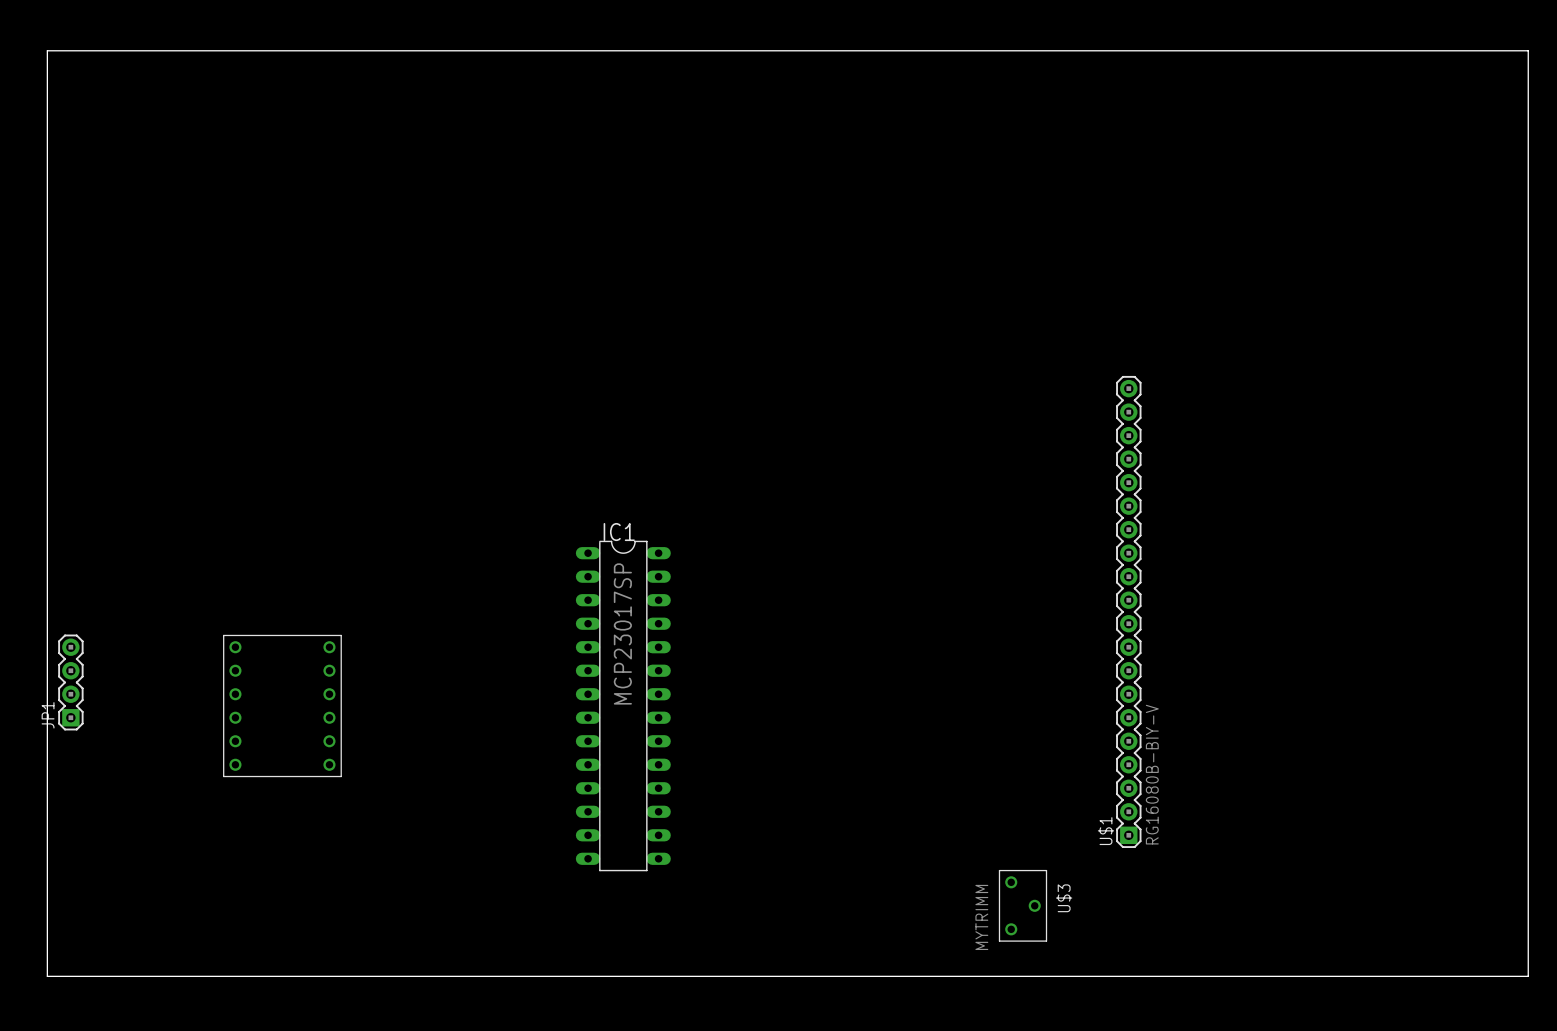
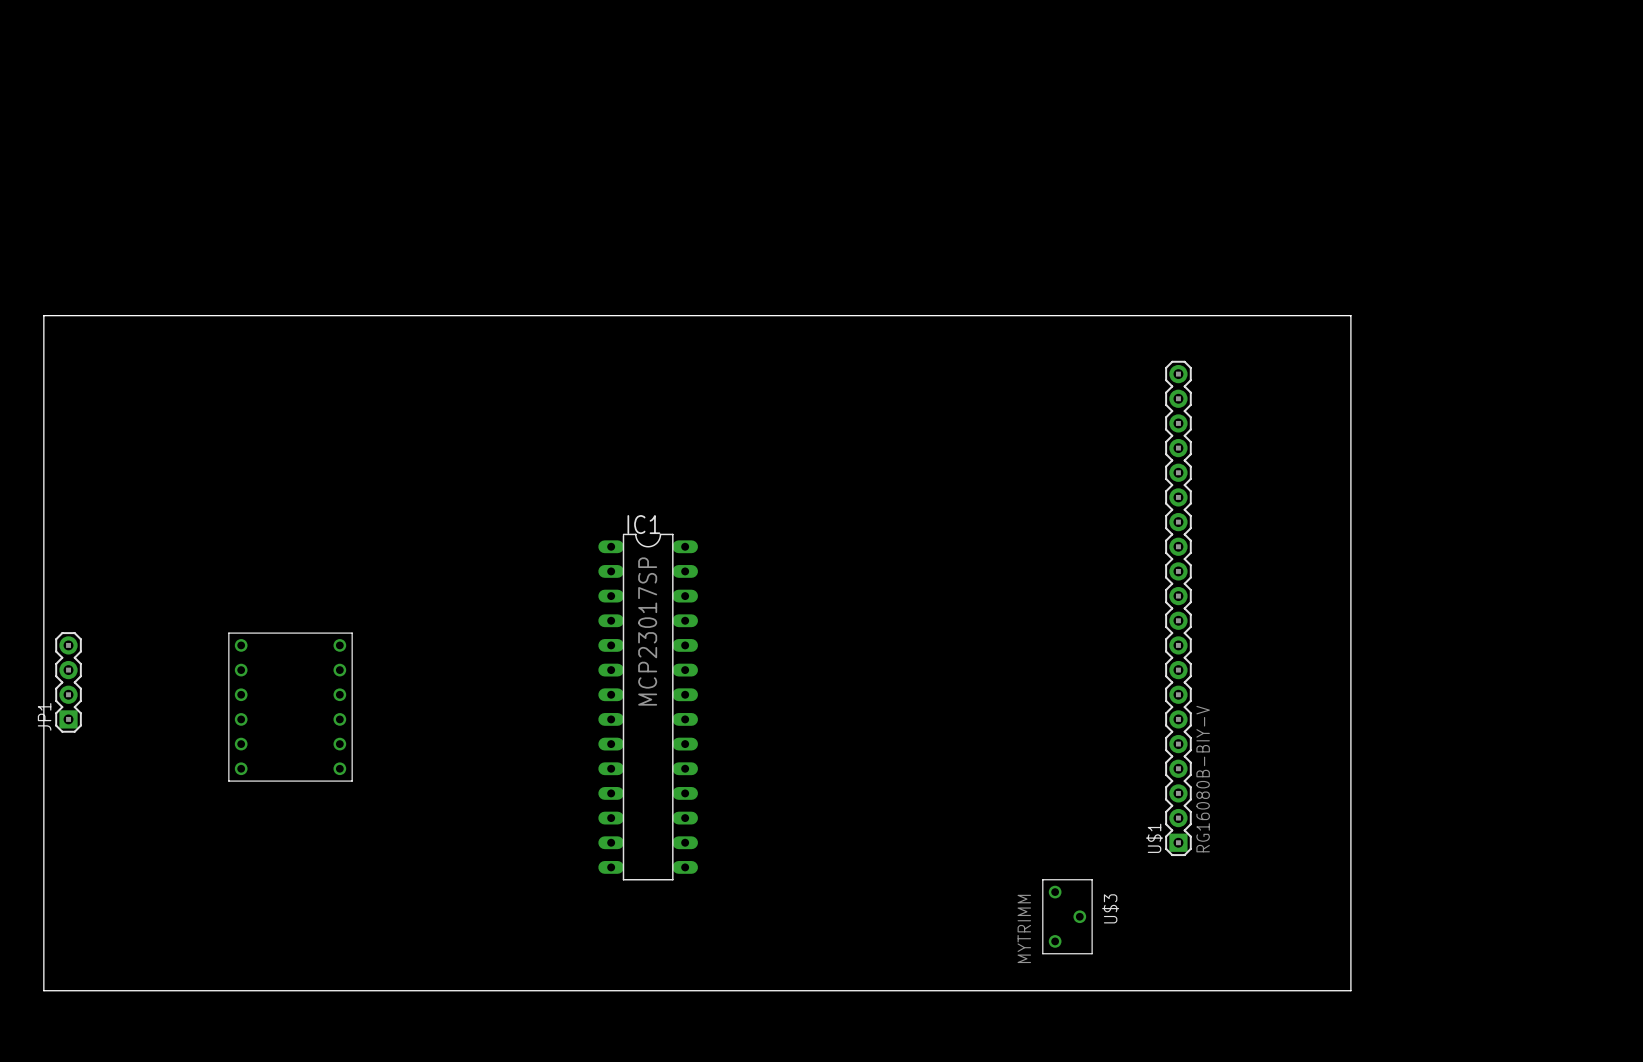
board edge: (47, 332) (47, 50) (1528, 50) (1528, 976) (1293, 976) -> (43, 315) (1350, 315) (1350, 990)

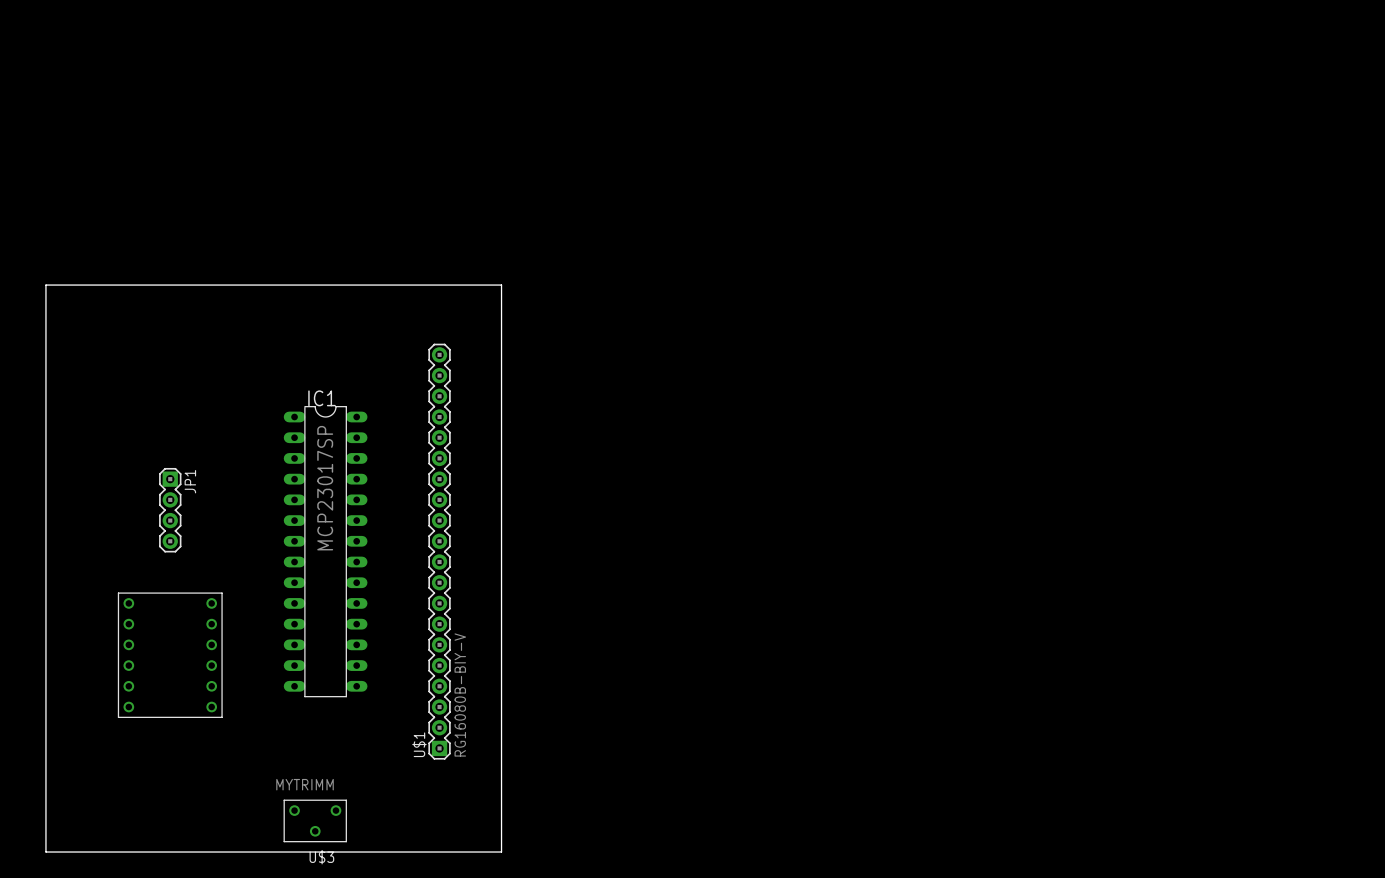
board edge: (586, 315) (1350, 315) (1350, 990) (586, 990) -> (501, 285) (501, 852)
U$1 position: (1178, 608) -> (439, 551)
JP1 rotation: 0° (68, 682) -> 180° (170, 510)
JP1 position: (68, 682) -> (170, 510)
part position: (290, 707) -> (170, 655)
IC1 position: (648, 707) -> (325, 551)
U$3 rotation: 0° (1067, 916) -> 90° clockwise (315, 820)
U$3 position: (1067, 916) -> (315, 820)

